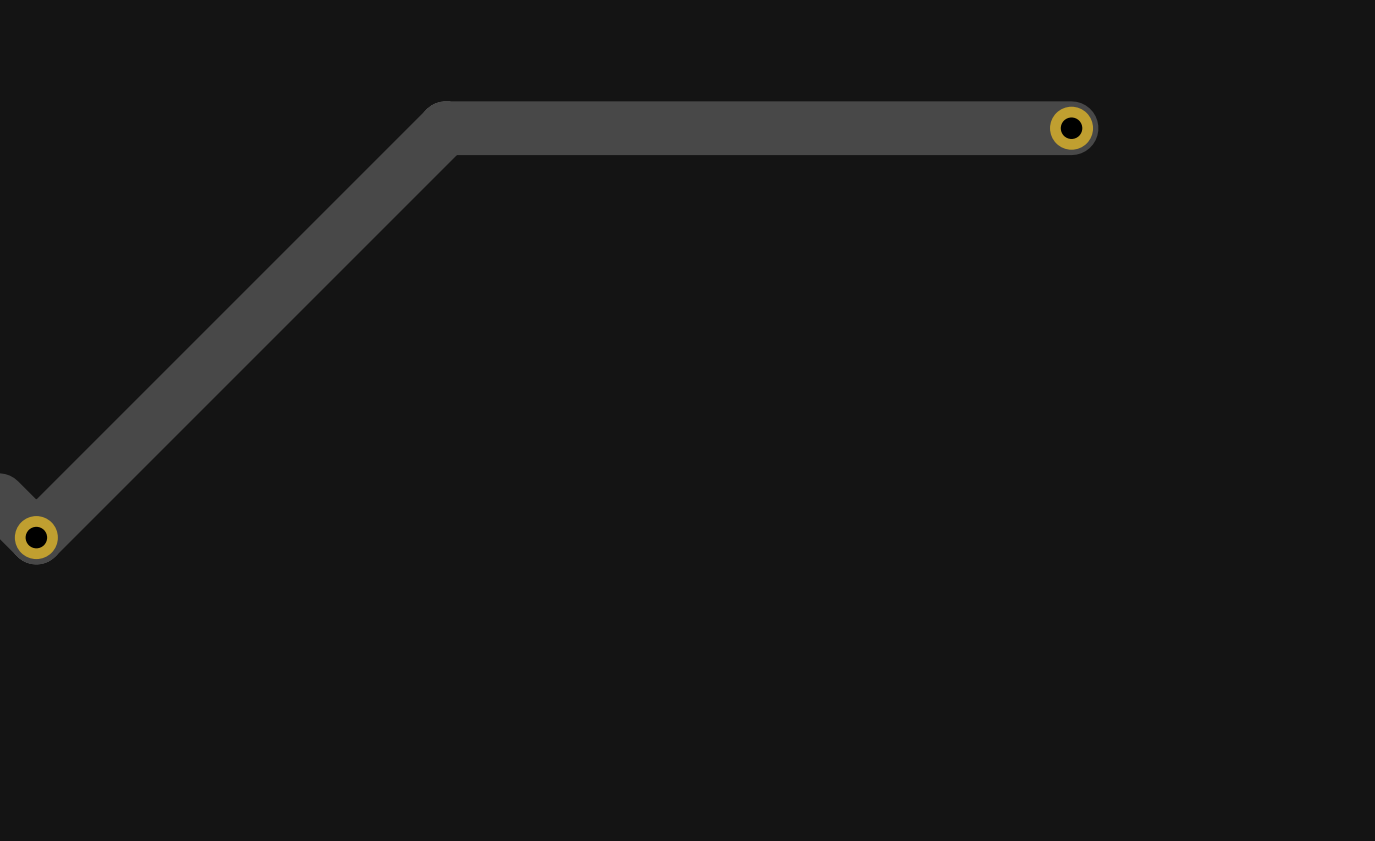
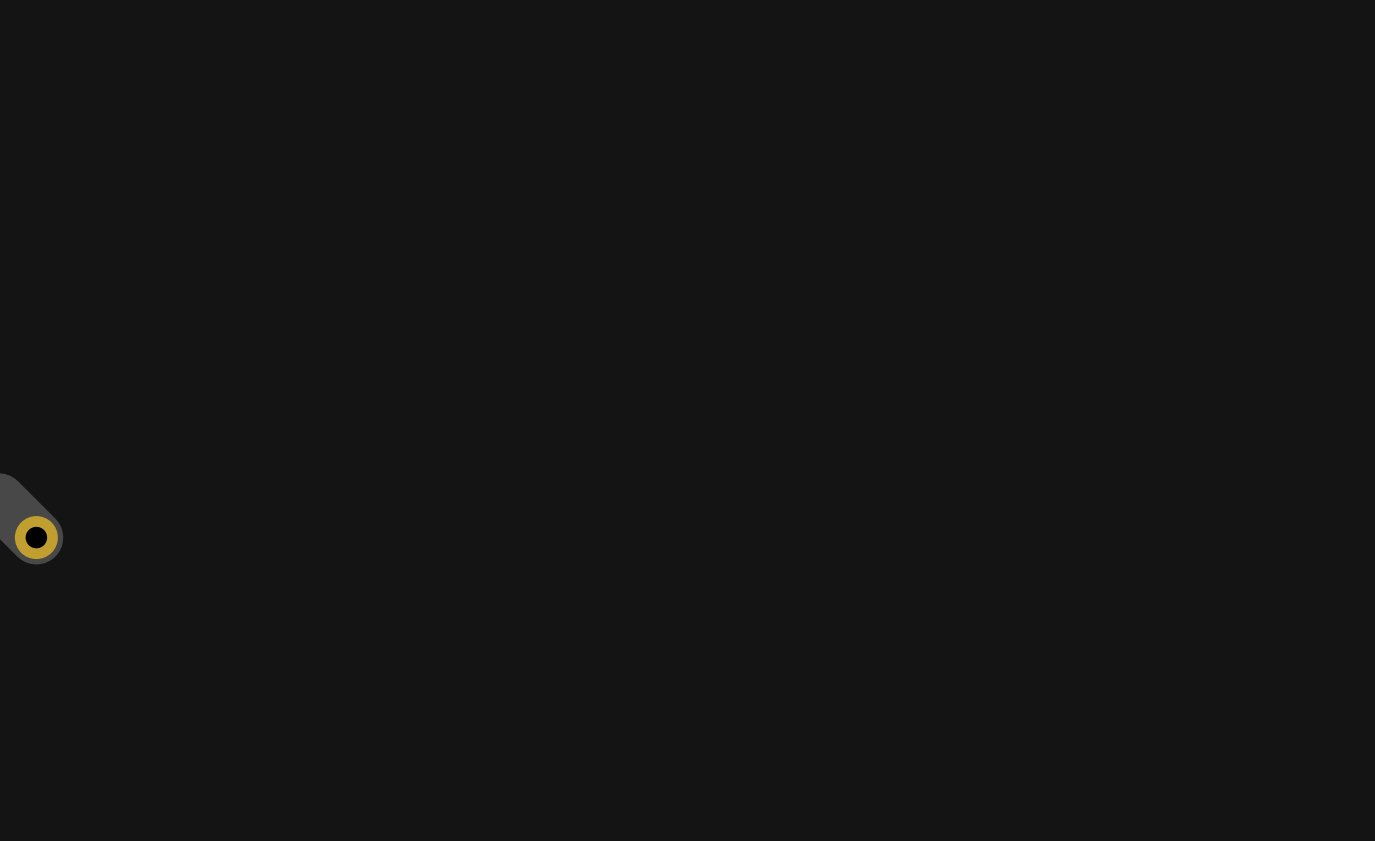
track: (1071, 128) (445, 128) (36, 537) -> none
via: (1071, 128) -> none

